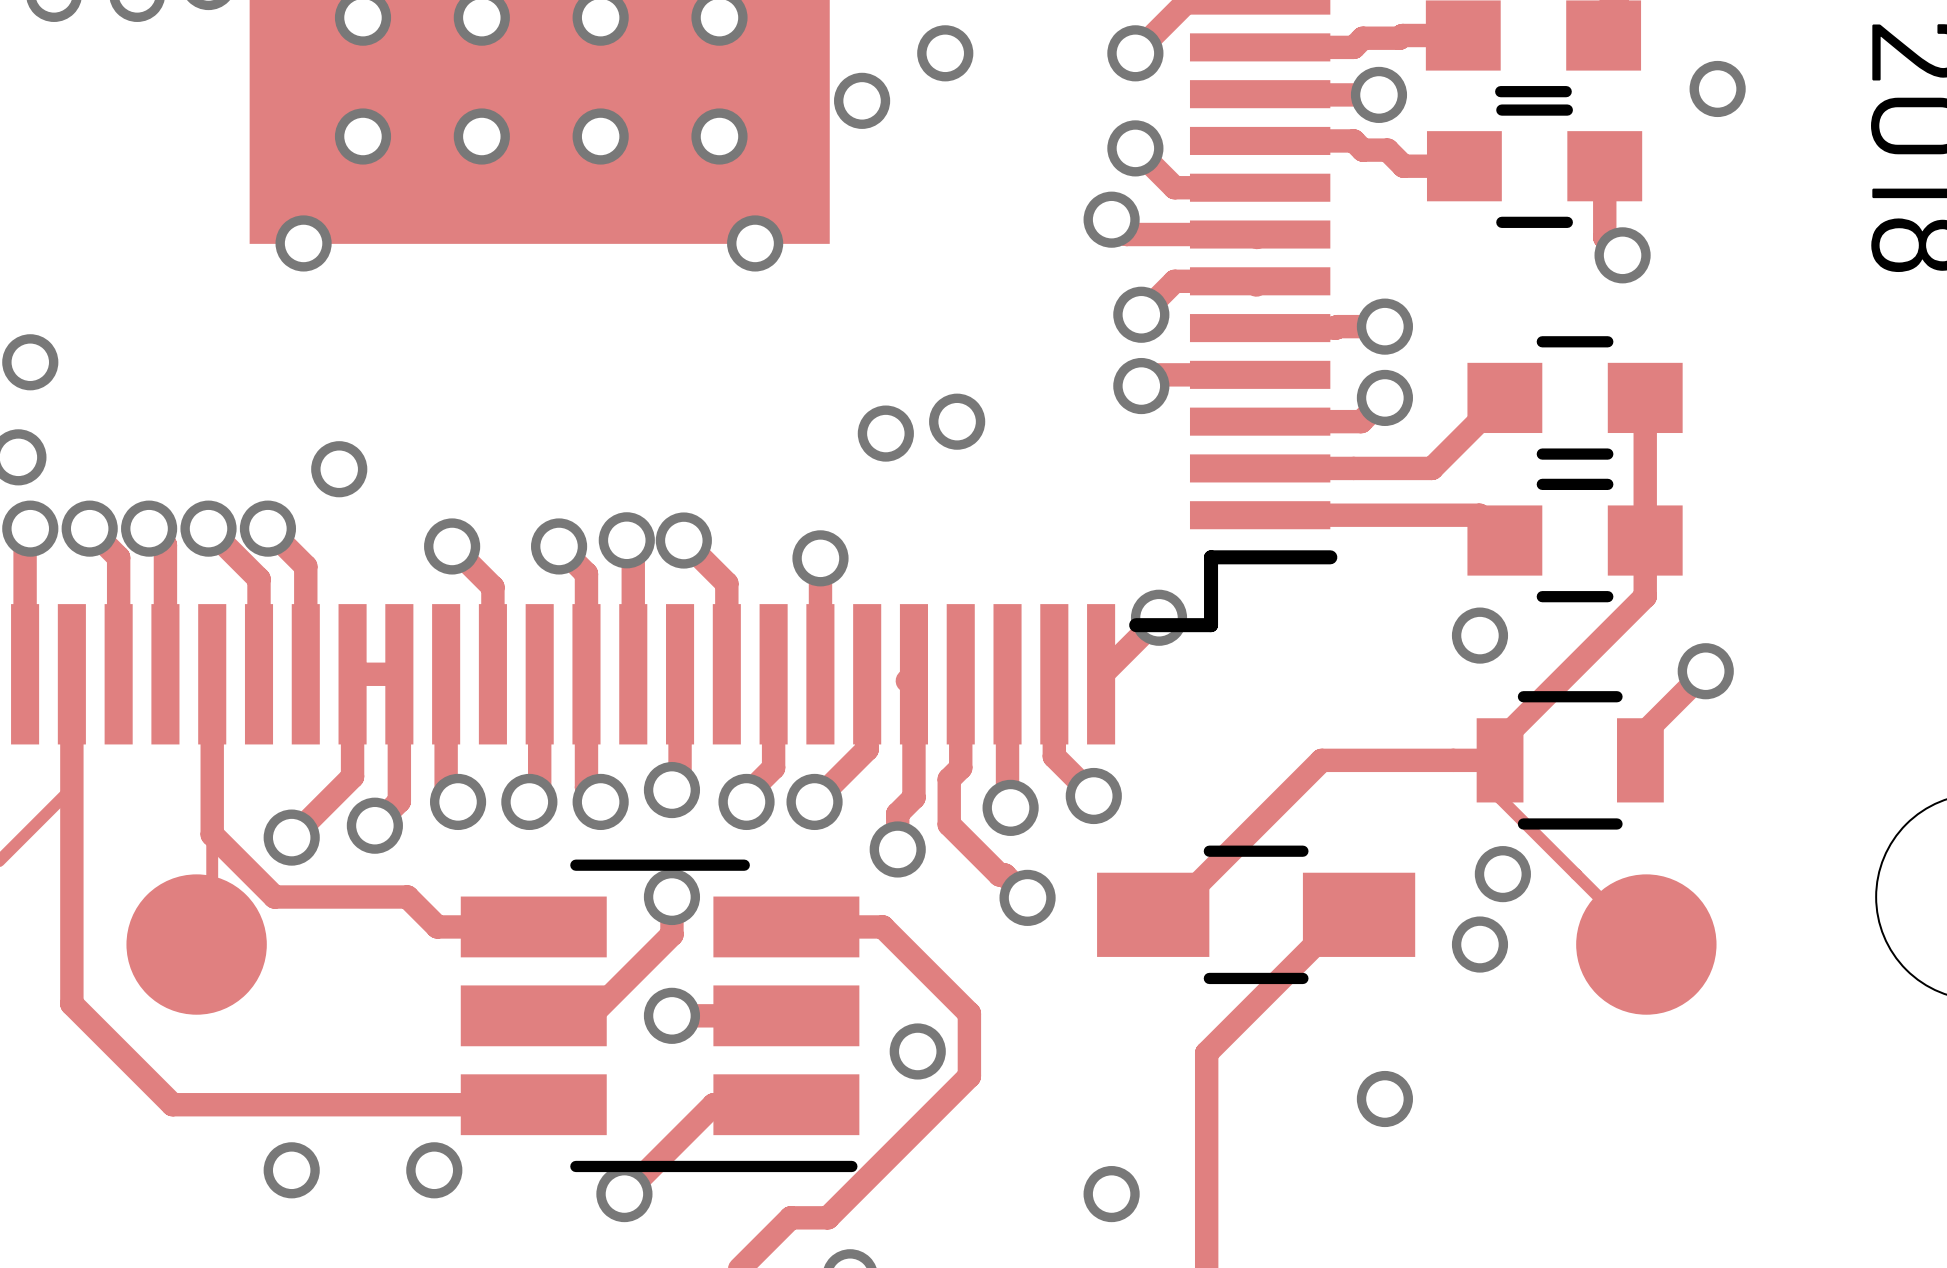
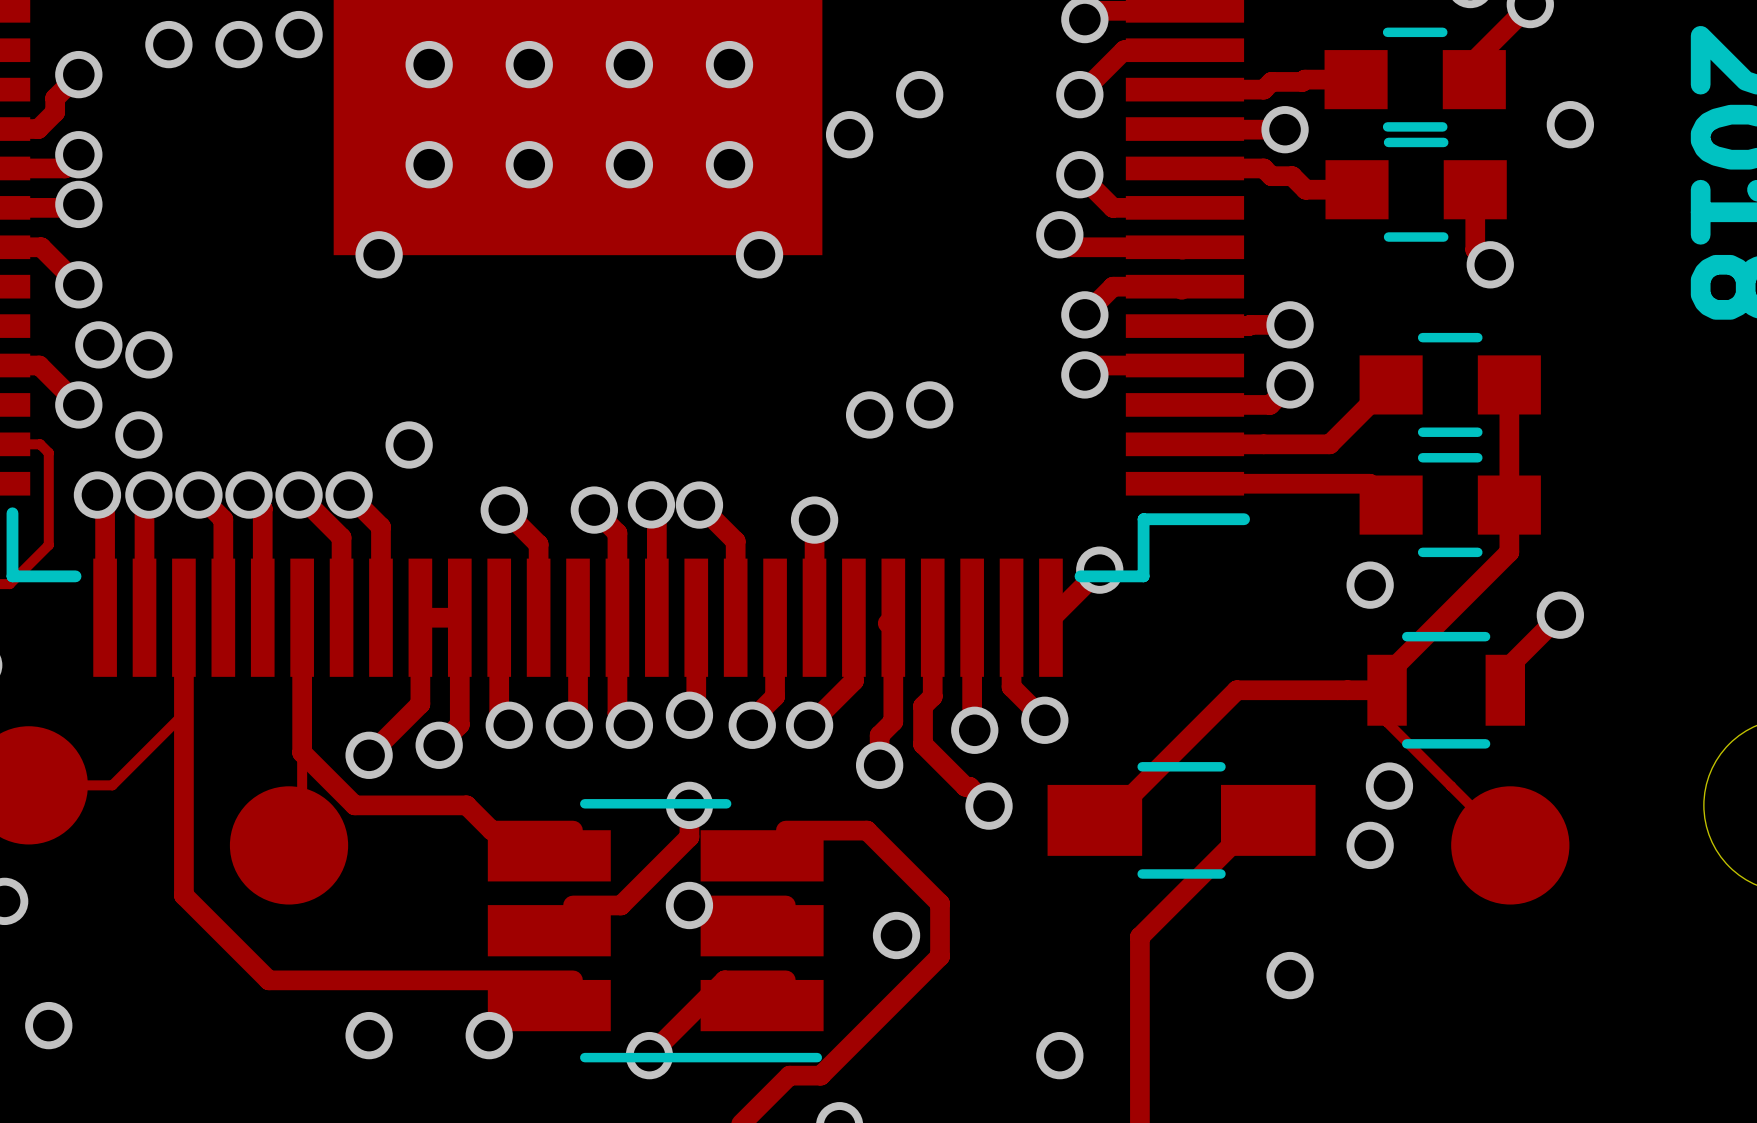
part position: (660, 1015) -> (655, 930)

